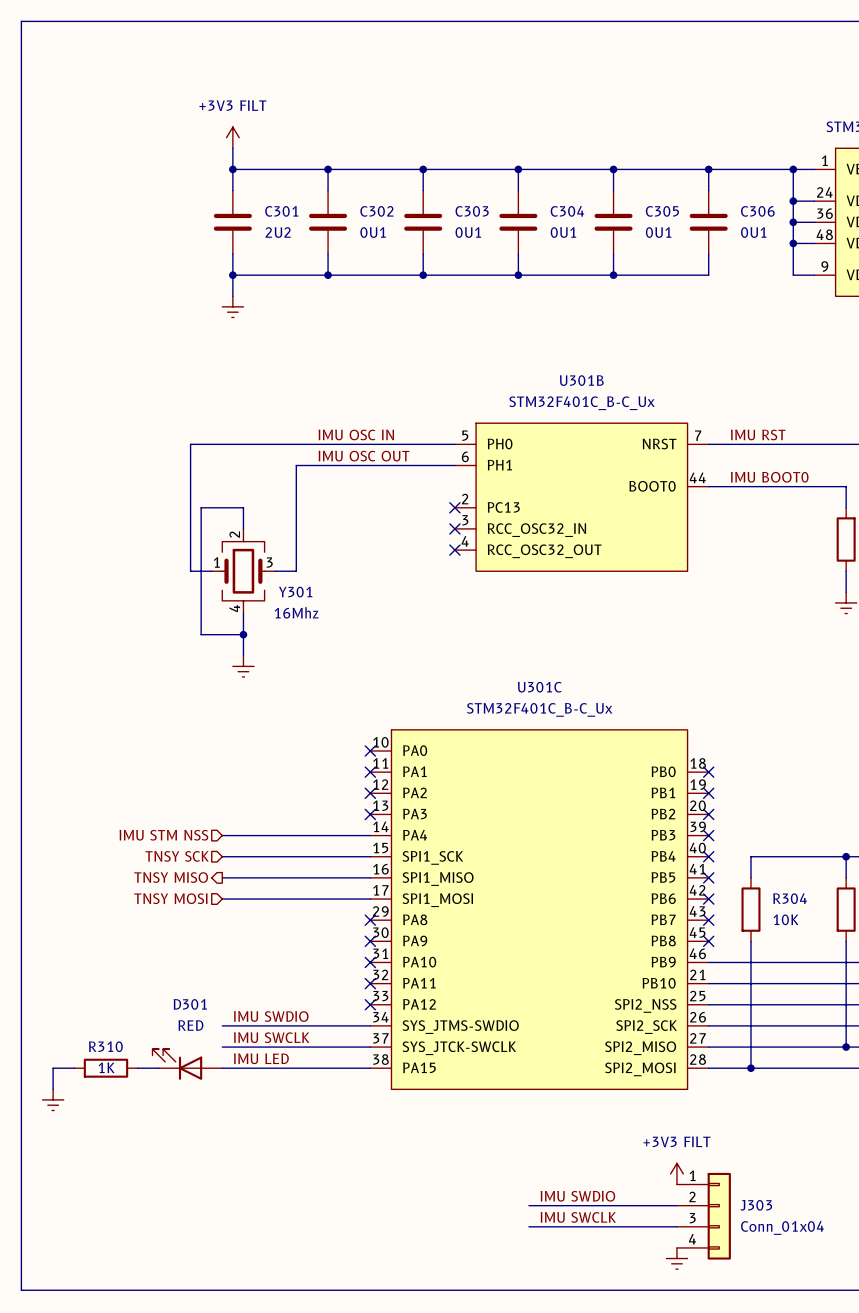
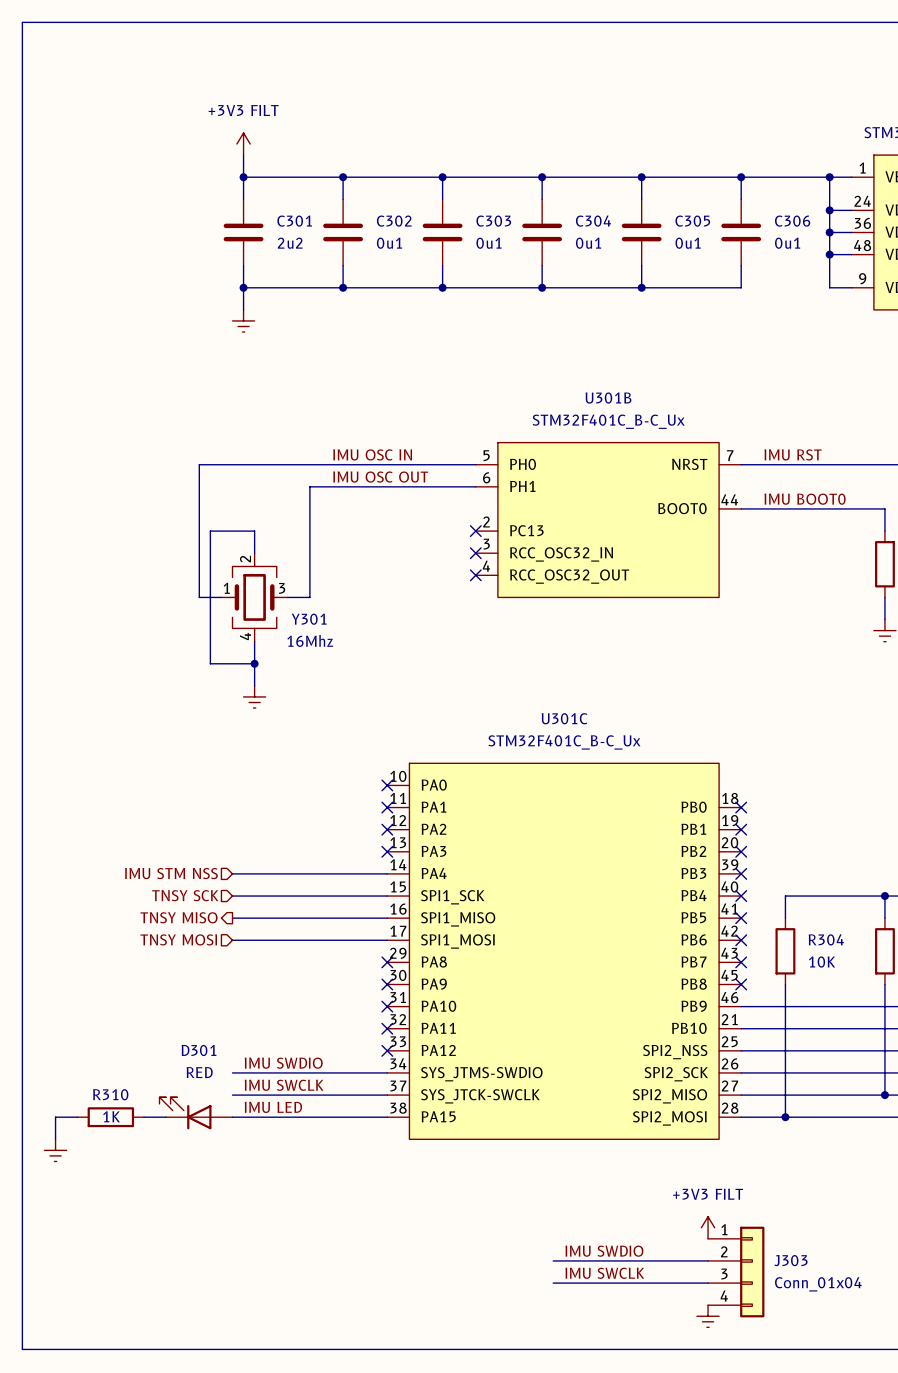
C301 value: 2U2 (278, 232) -> 2u2 (290, 243)
C302 value: 0U1 (373, 232) -> 0u1 (389, 243)
C303 value: 0U1 (468, 232) -> 0u1 (489, 243)
C304 value: 0U1 (563, 232) -> 0u1 (588, 243)
C305 value: 0U1 (658, 232) -> 0u1 (688, 243)
C306 value: 0U1 (753, 232) -> 0u1 (787, 243)

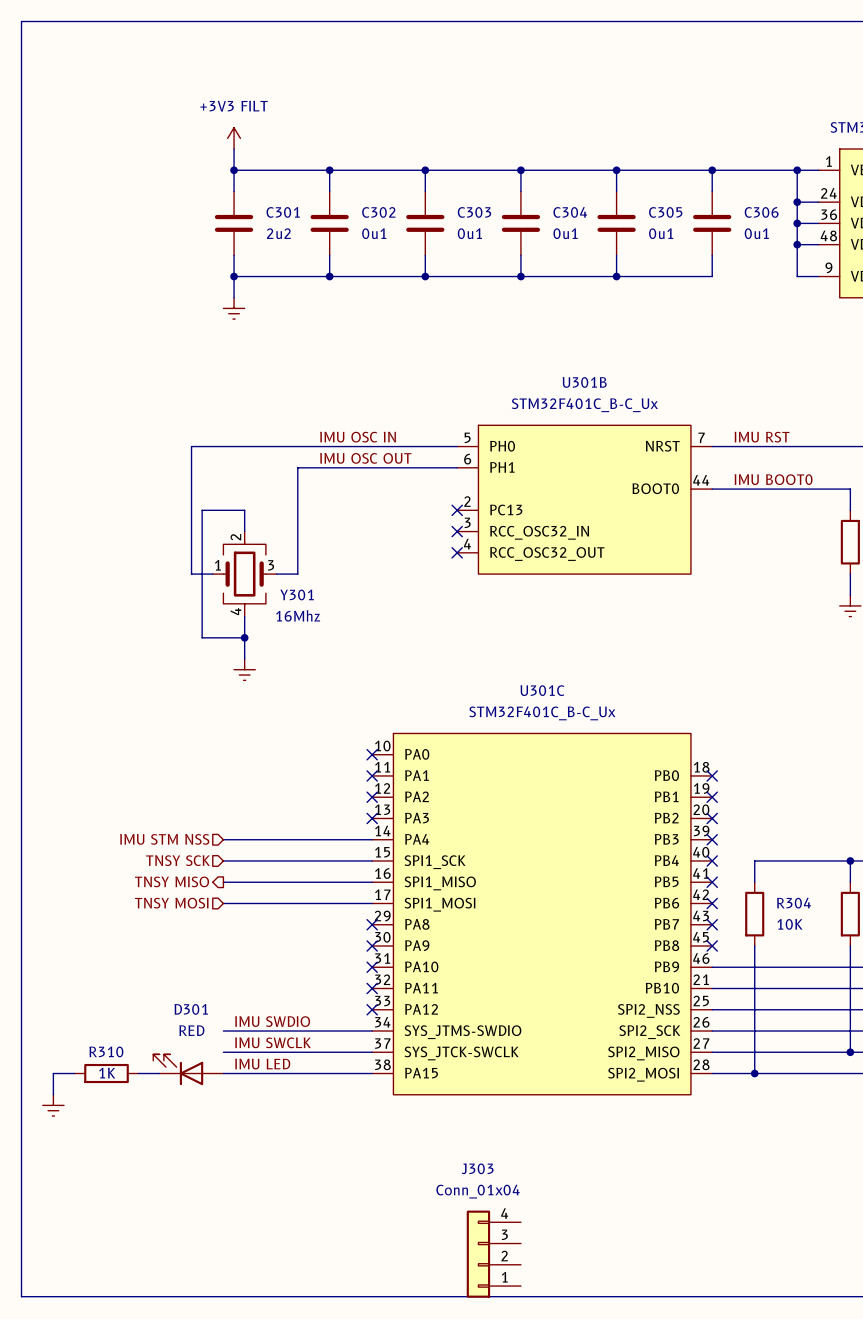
power symbol: +3V3 FILT (708, 1227) -> none
label: IMU SWDIO (604, 1251) -> none
wire: (553, 1260) (708, 1260) -> none
J303 name position: J303 (790, 1260) -> J303 (477, 1168)
J303 position: (736, 1272) -> (493, 1254)
J303 rotation: 0° (752, 1272) -> 180° (478, 1254)
label: IMU SWCLK (604, 1273) -> none
wire: (553, 1283) (708, 1283) -> none
J303 value position: Conn_01x04 (818, 1284) -> Conn_01x04 (478, 1191)
power symbol: (708, 1316) -> none

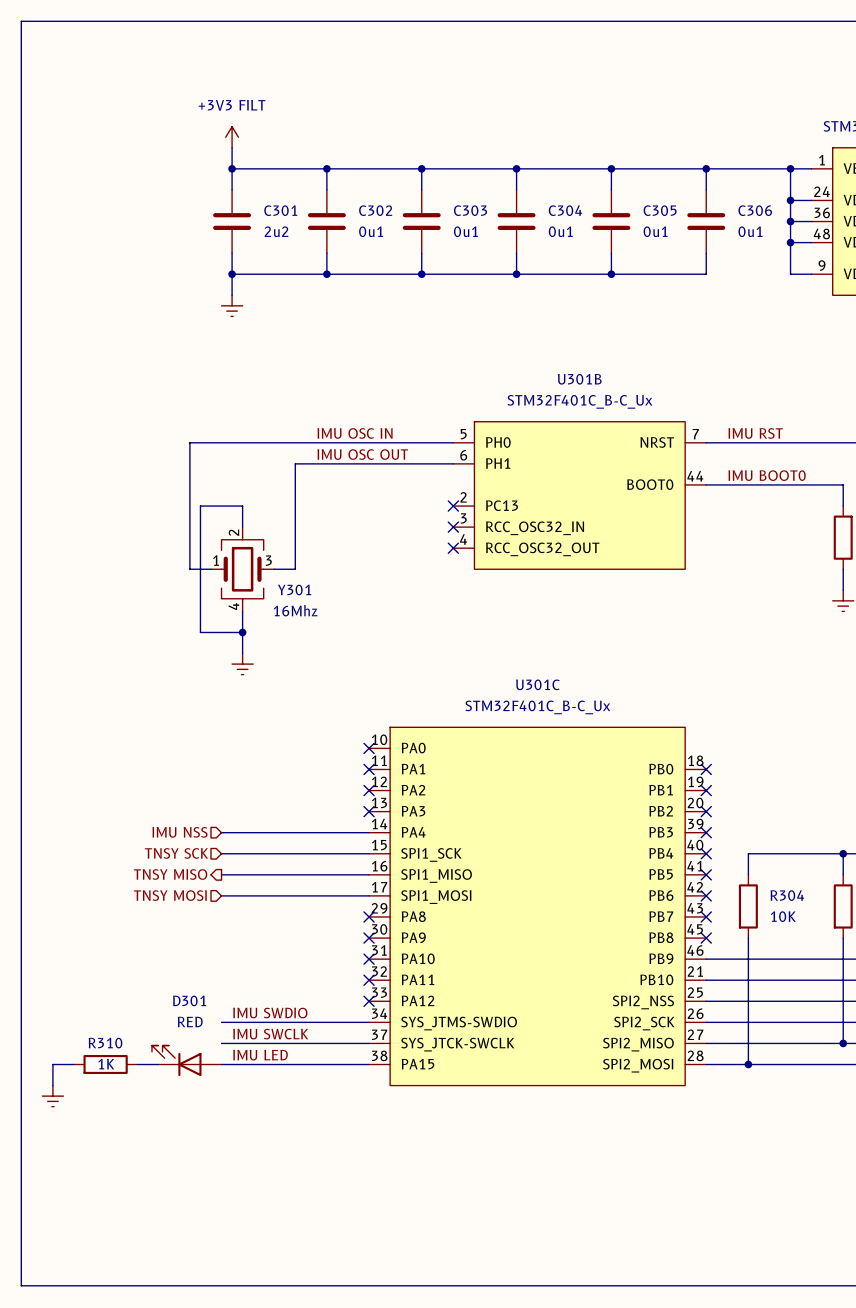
hierarchical label: IMU STM NSS (164, 839) -> IMU NSS (179, 832)
J303: Conn_01x04 (493, 1254) -> none

